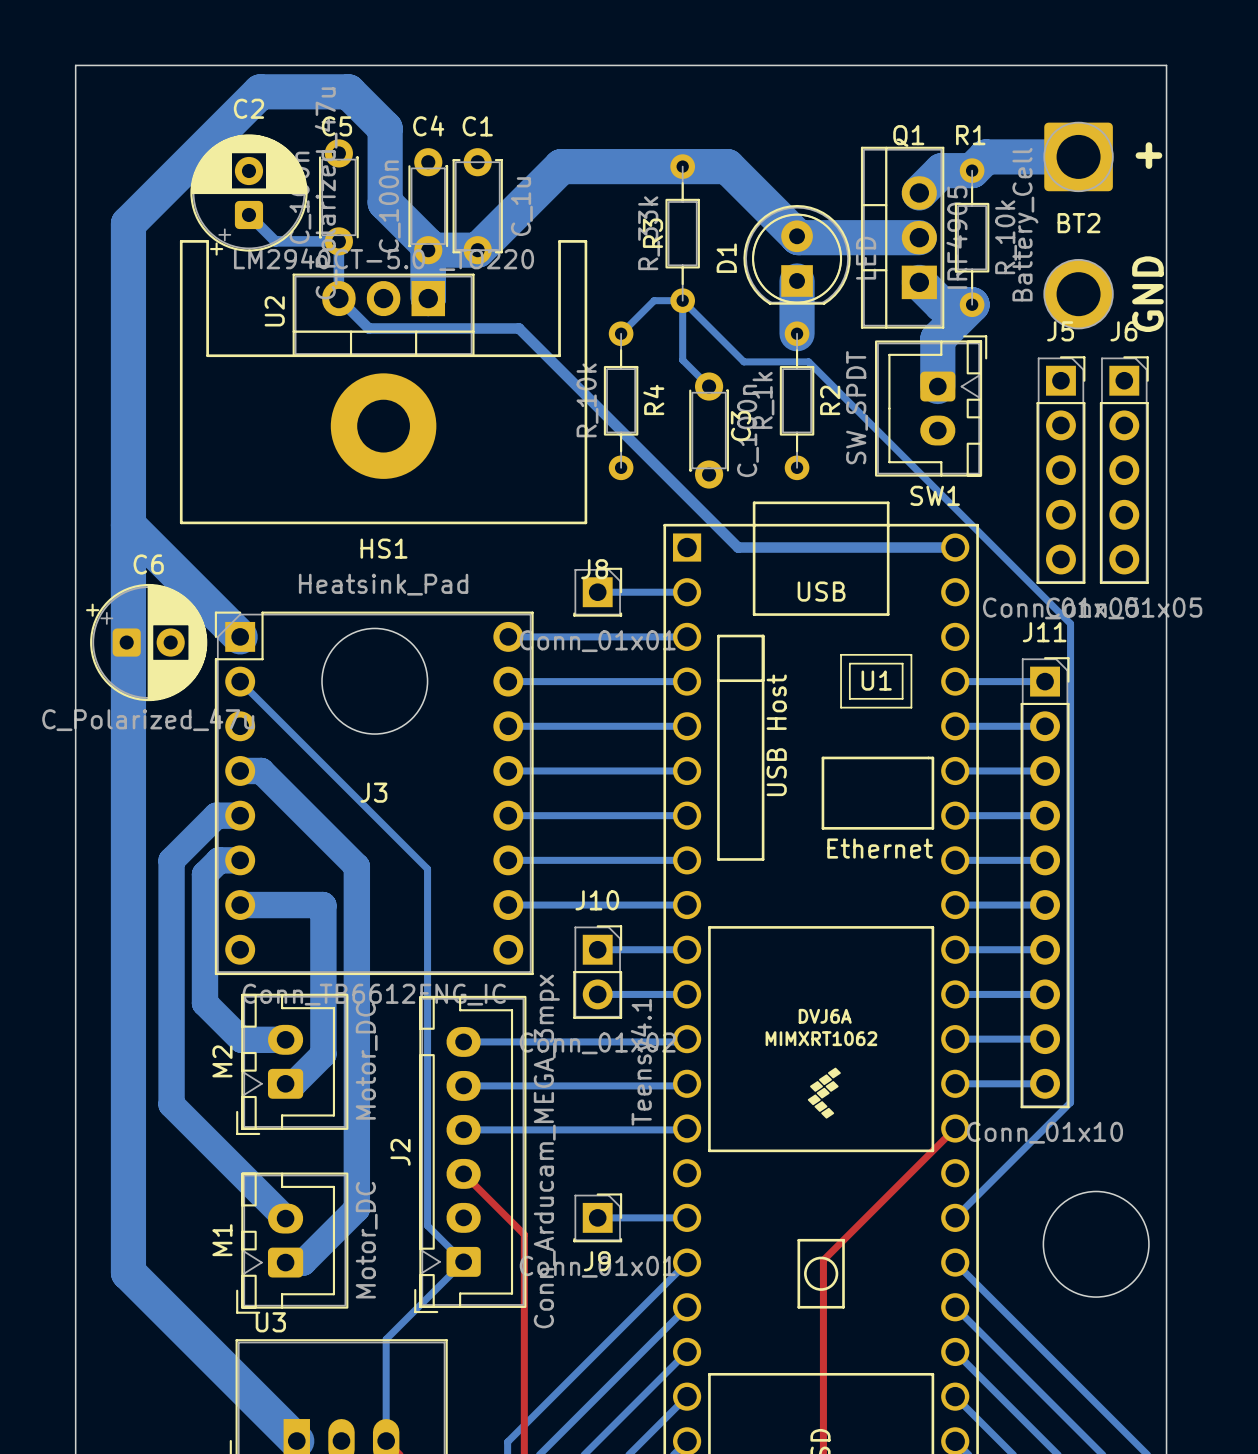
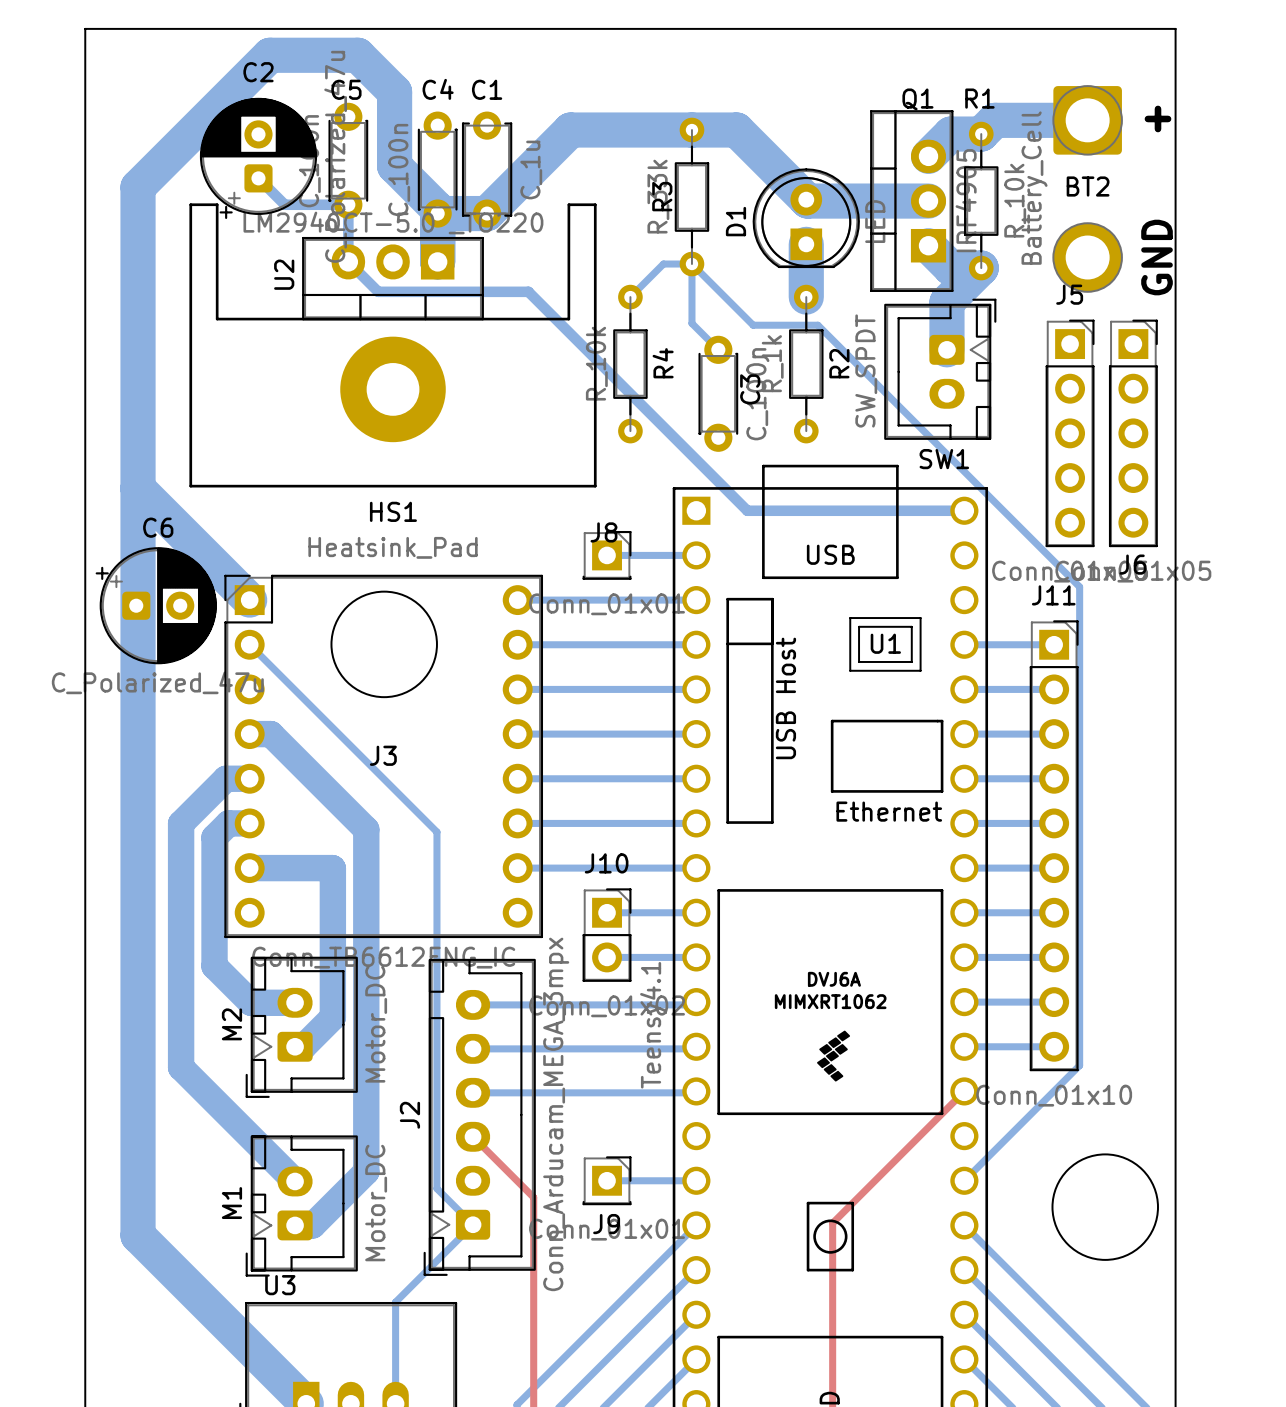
J6 name position: J6 (1123, 331) -> J6 (1132, 564)

